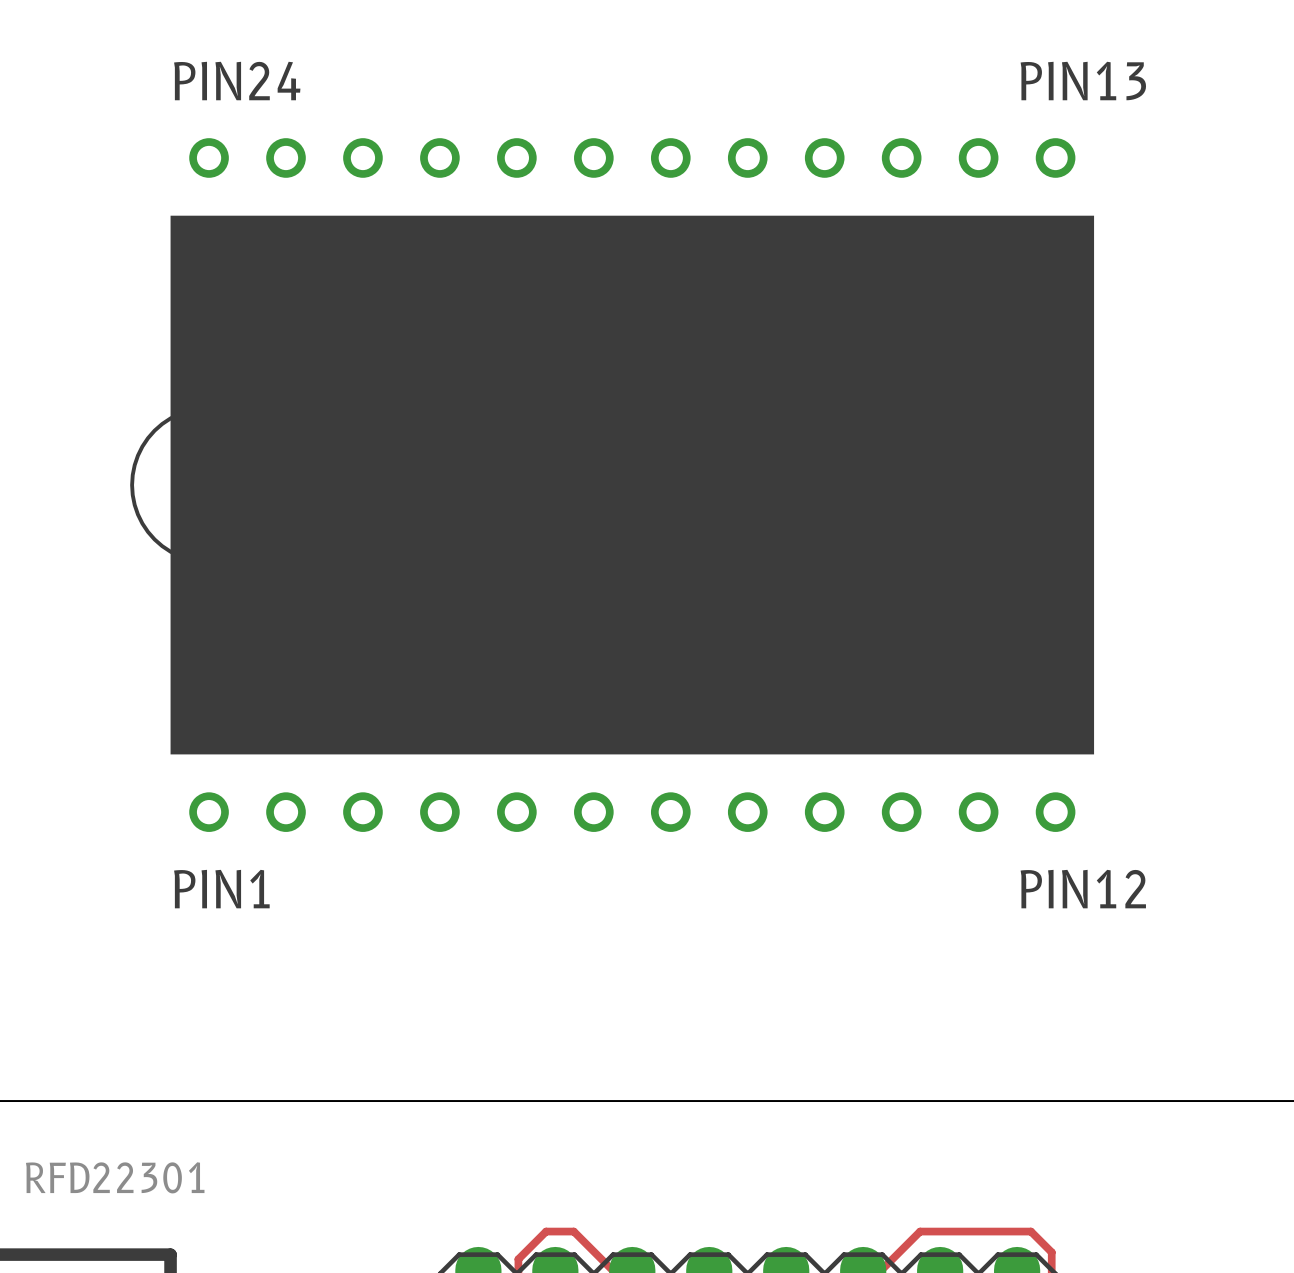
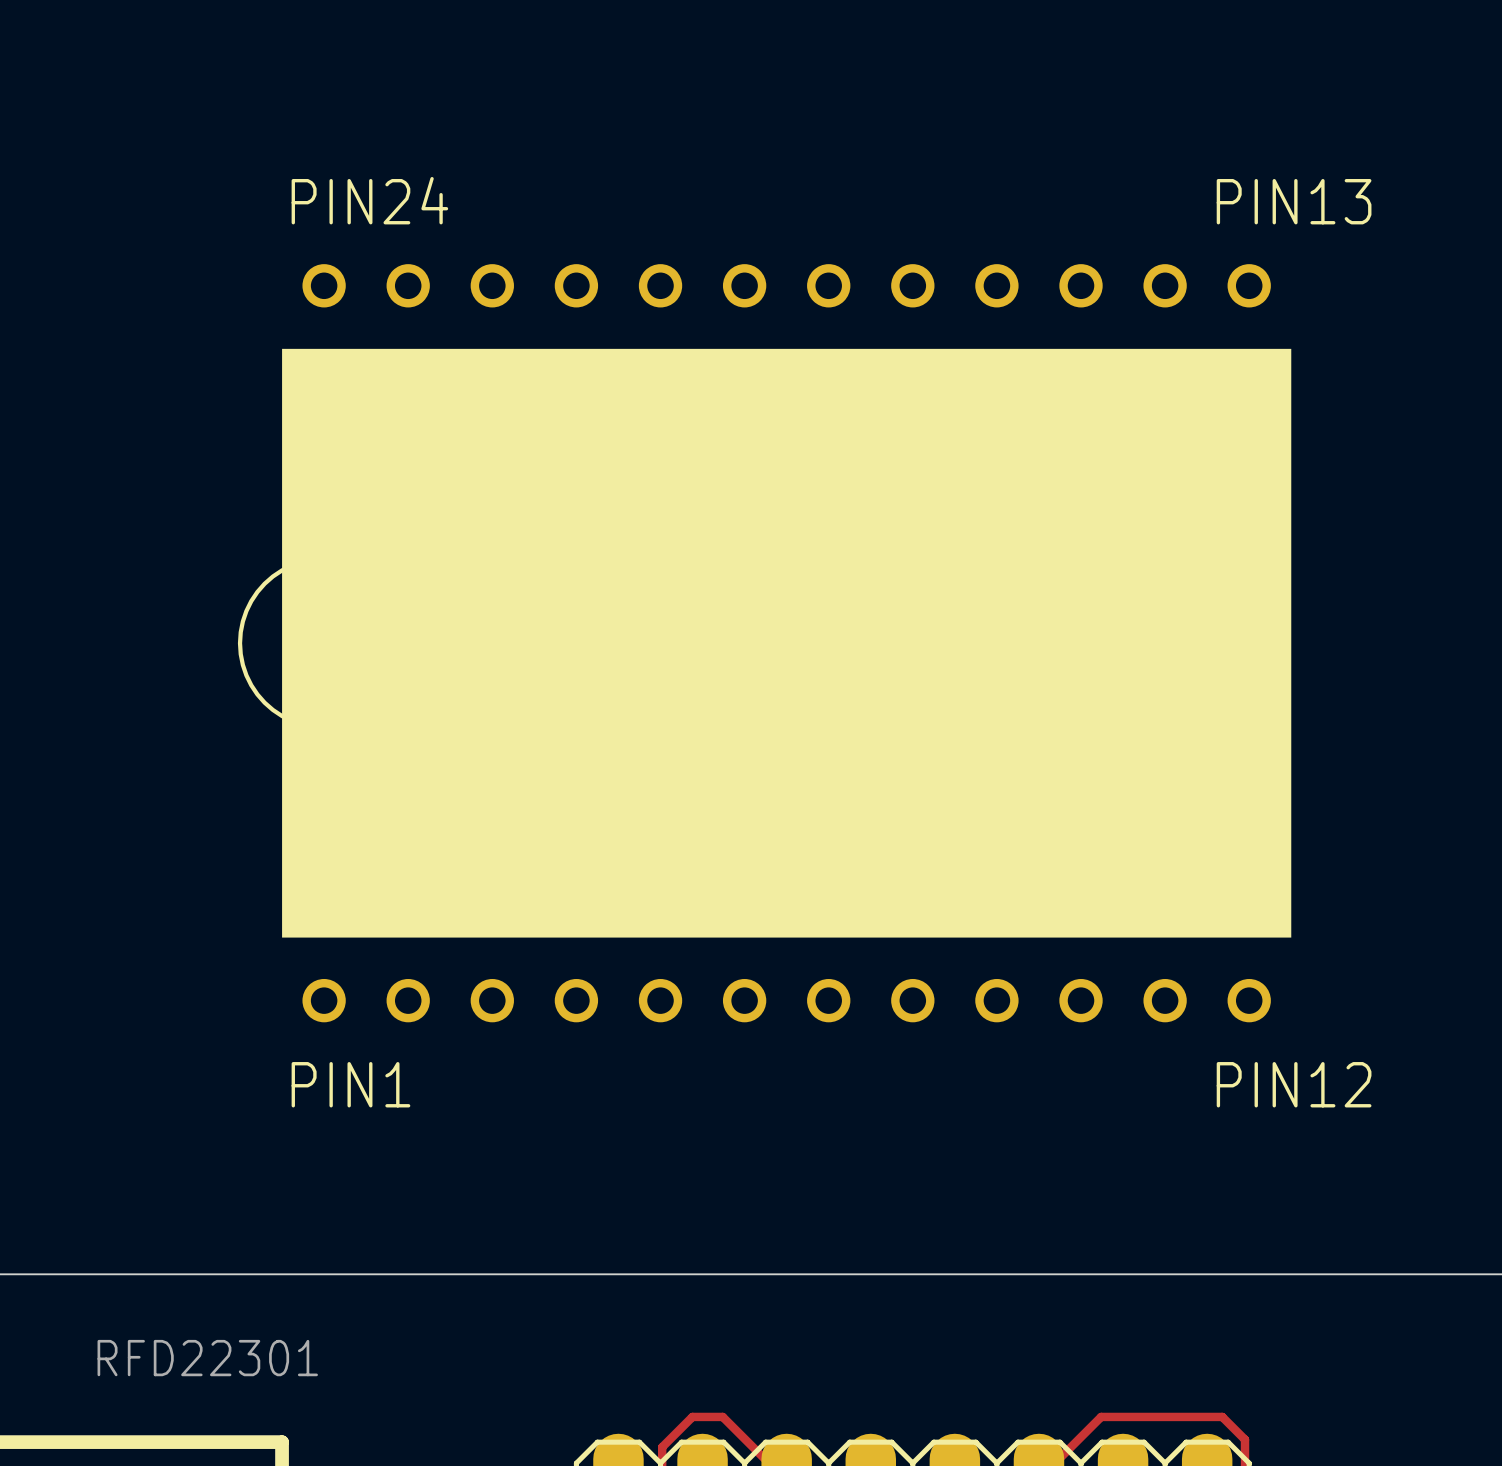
part position: (612, 485) -> (764, 643)

